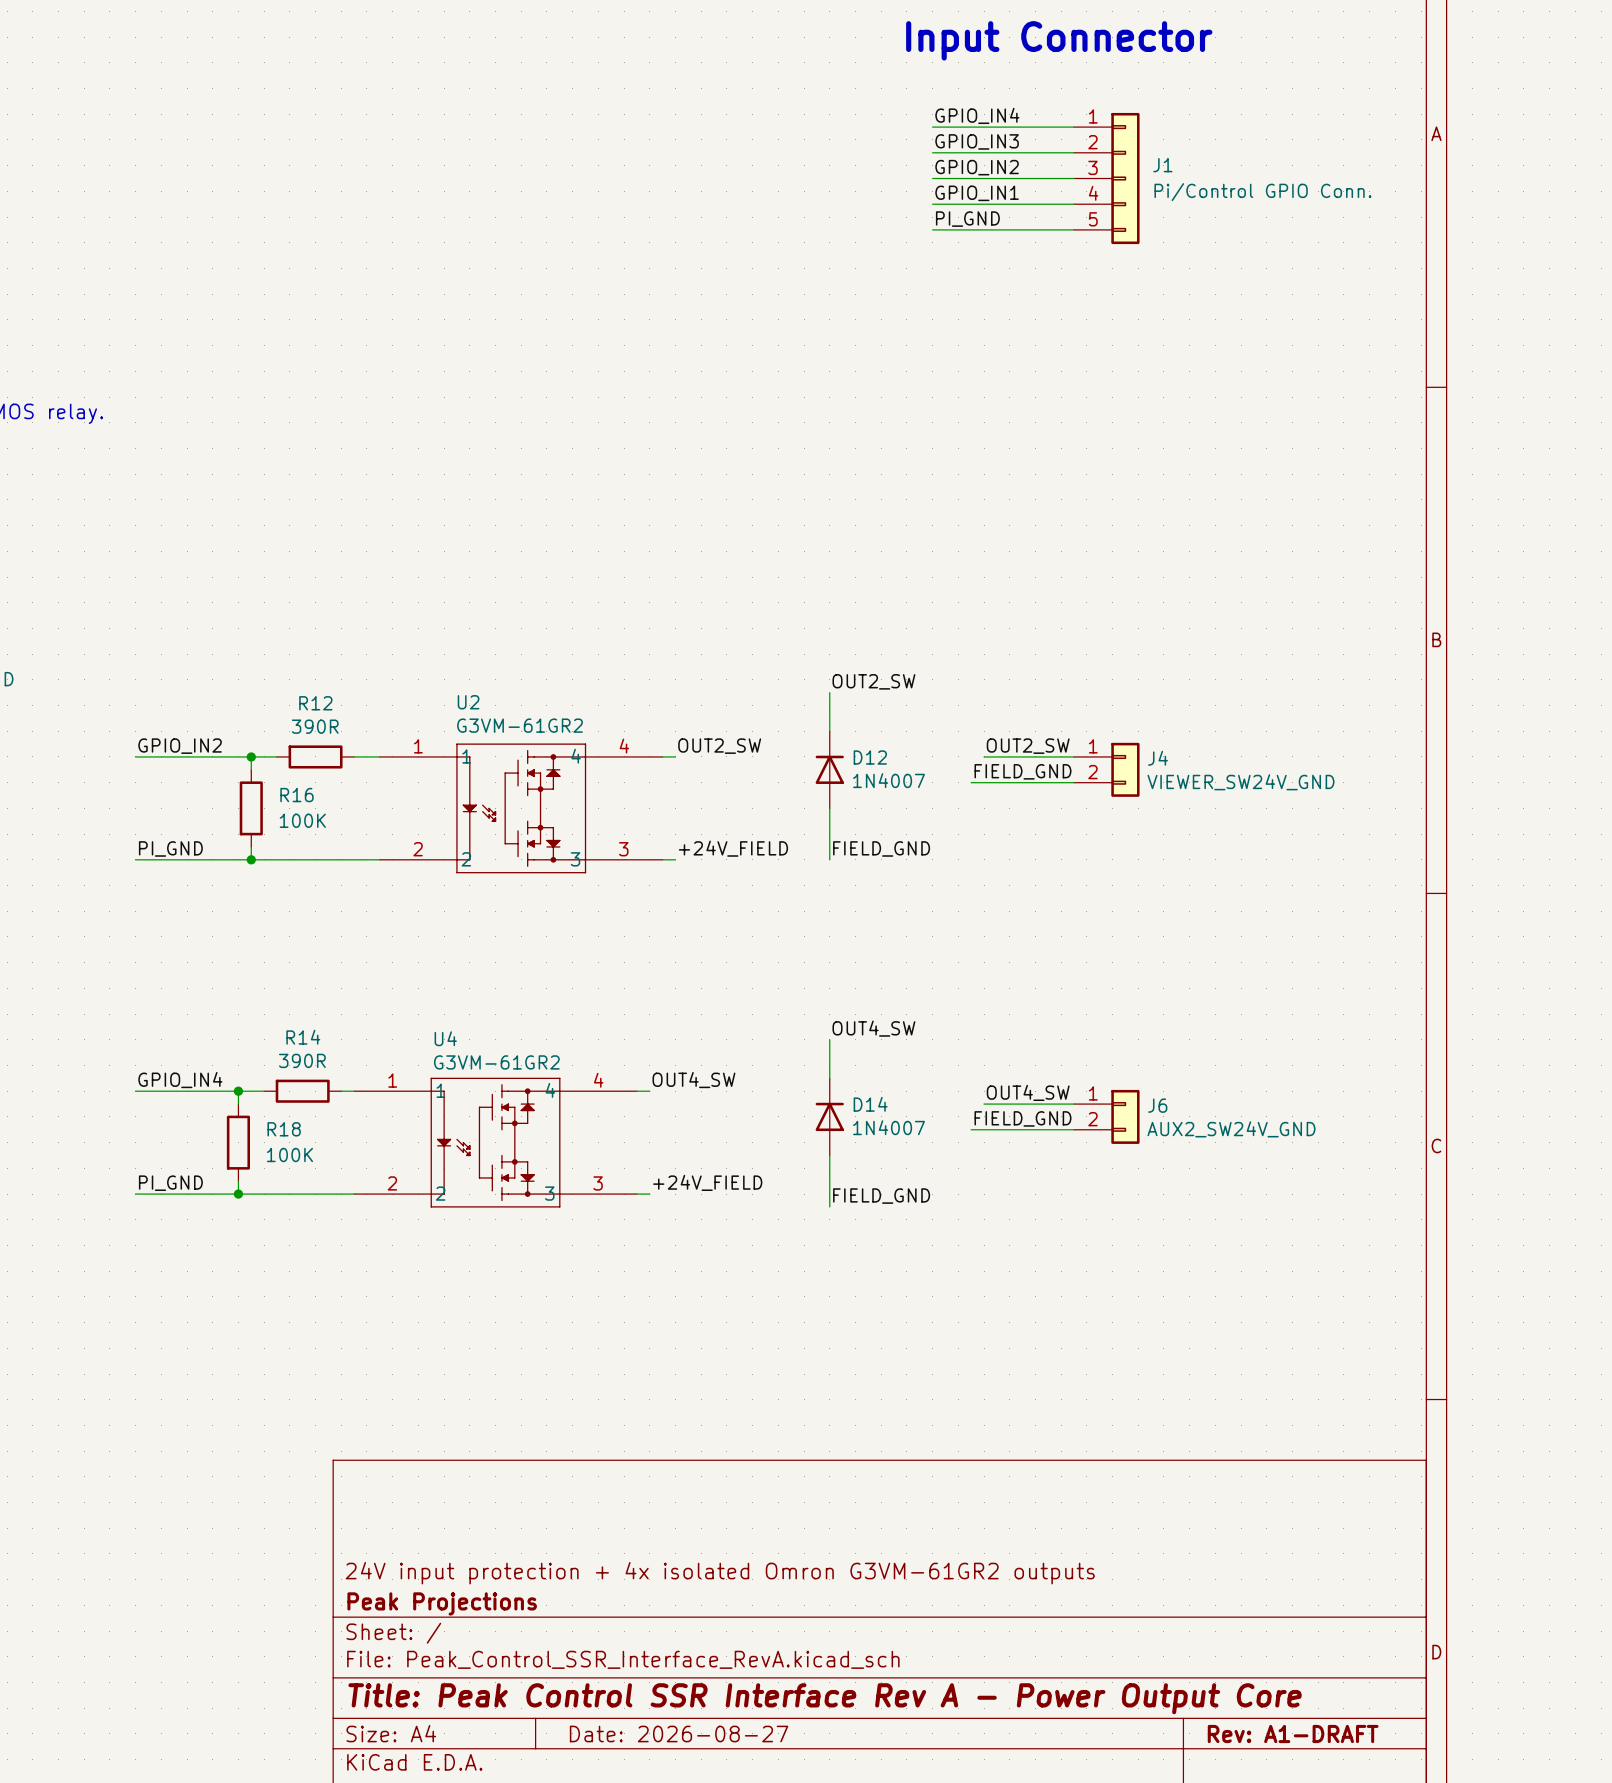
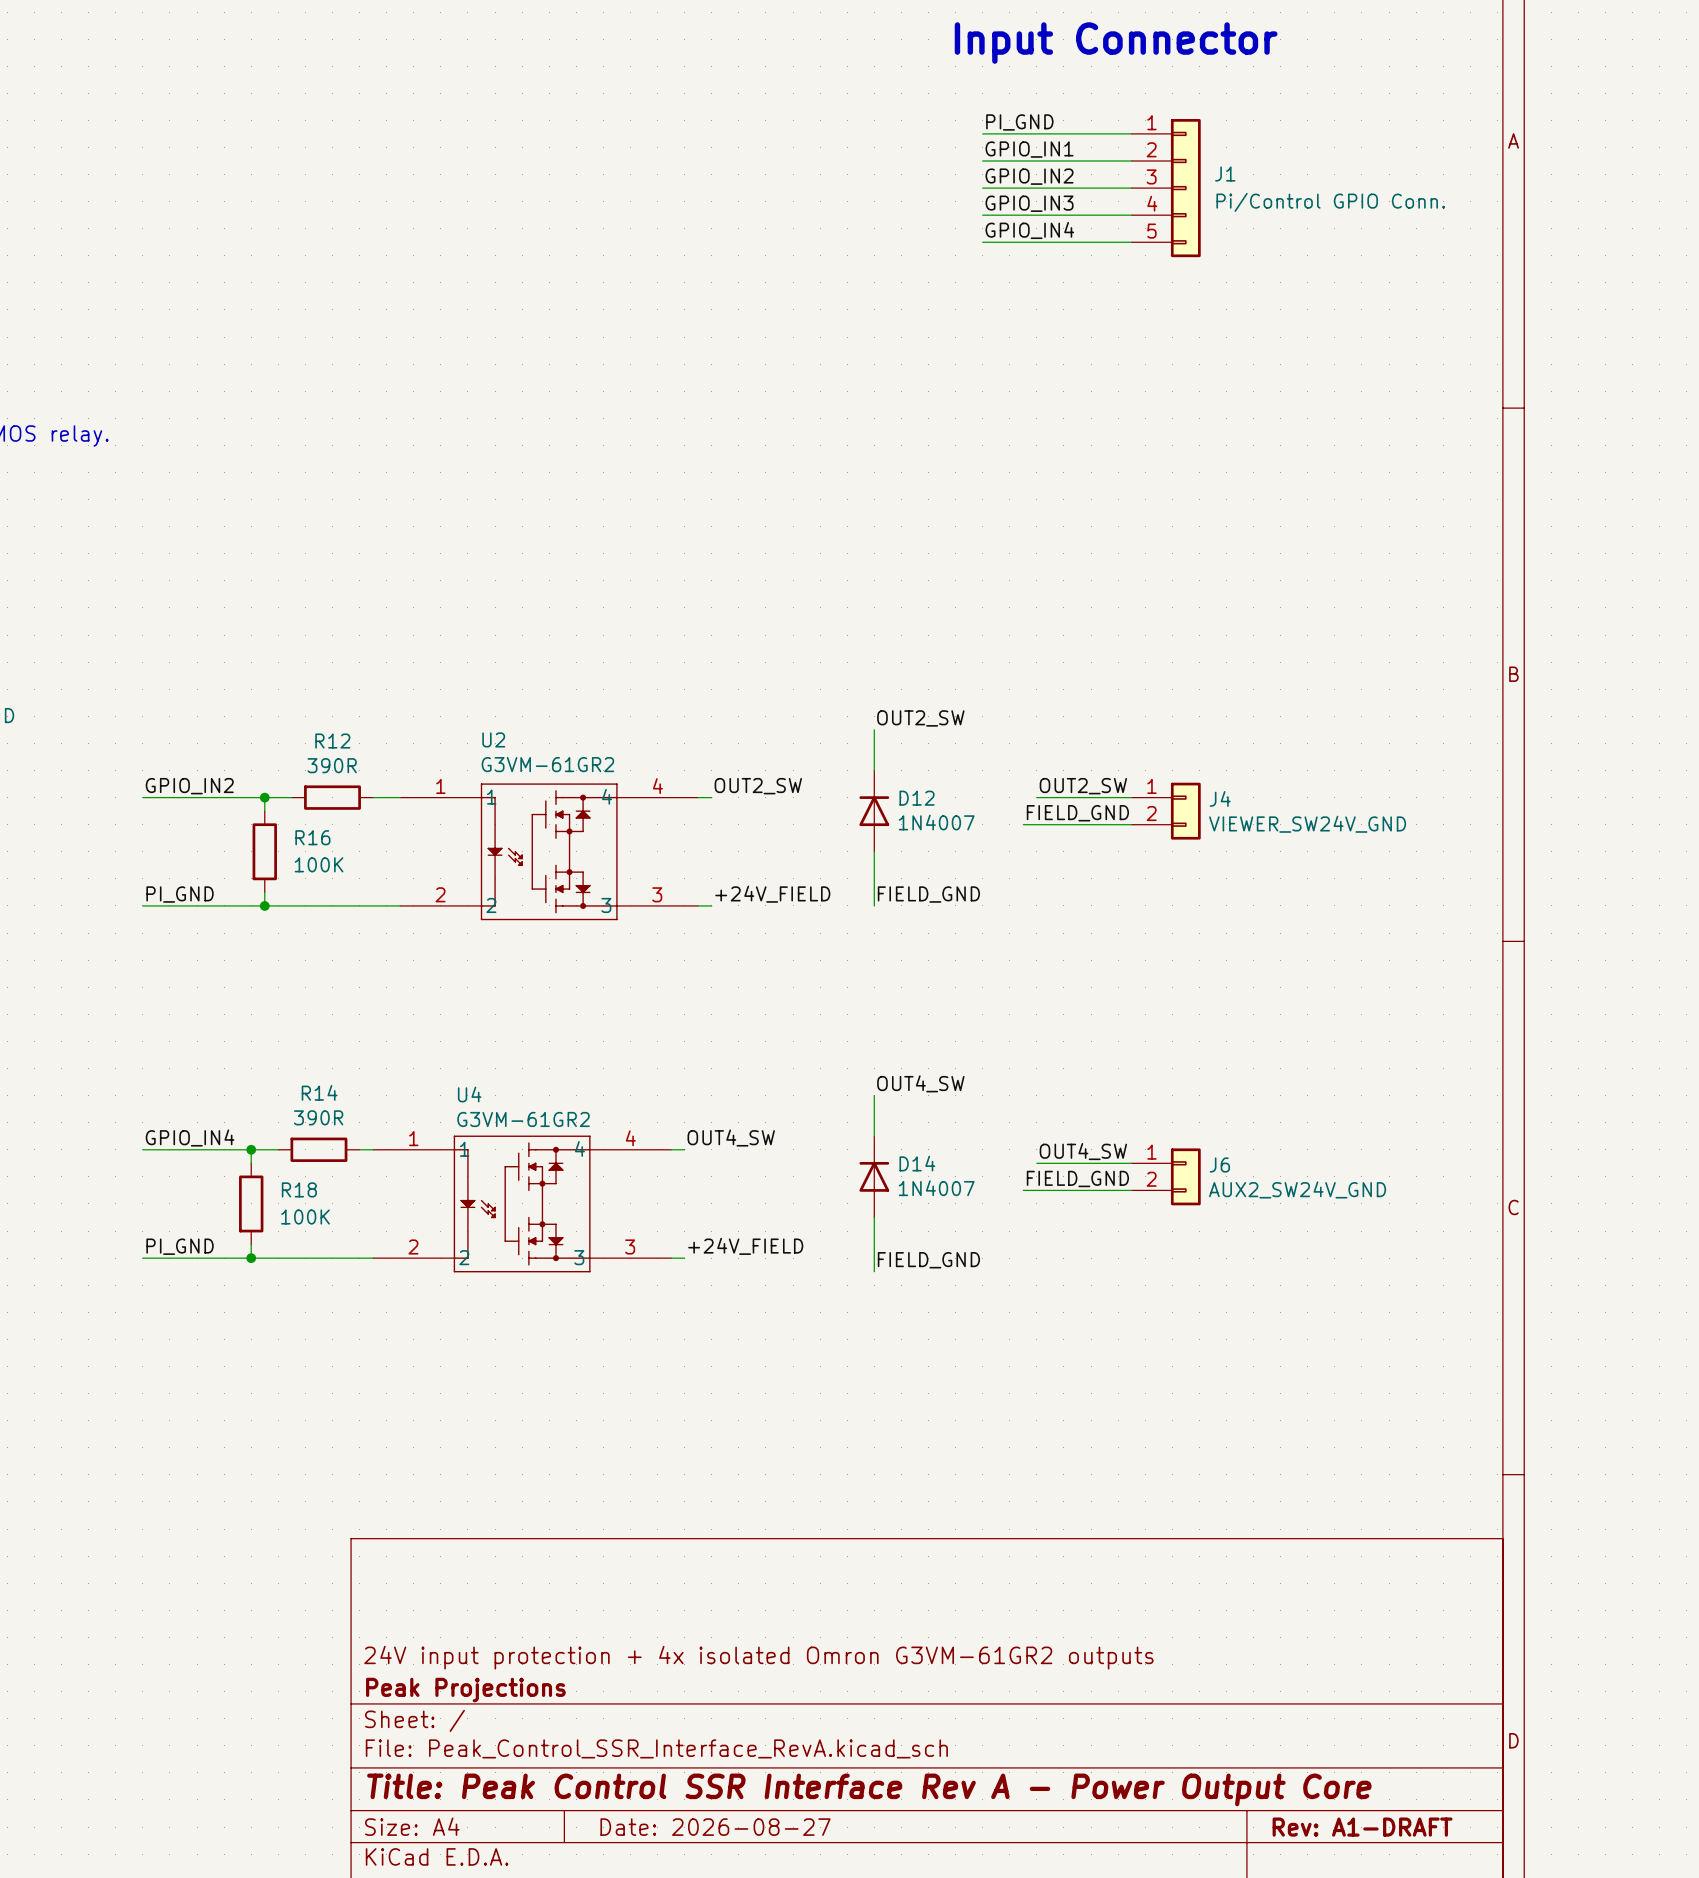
label: GPIO_IN4 (977, 115) -> PI_GND (1019, 122)
label: GPIO_IN3 (977, 141) -> GPIO_IN1 (1029, 149)
label: GPIO_IN1 (977, 193) -> GPIO_IN3 (1029, 203)
label: PI_GND (967, 219) -> GPIO_IN4 (1029, 230)

